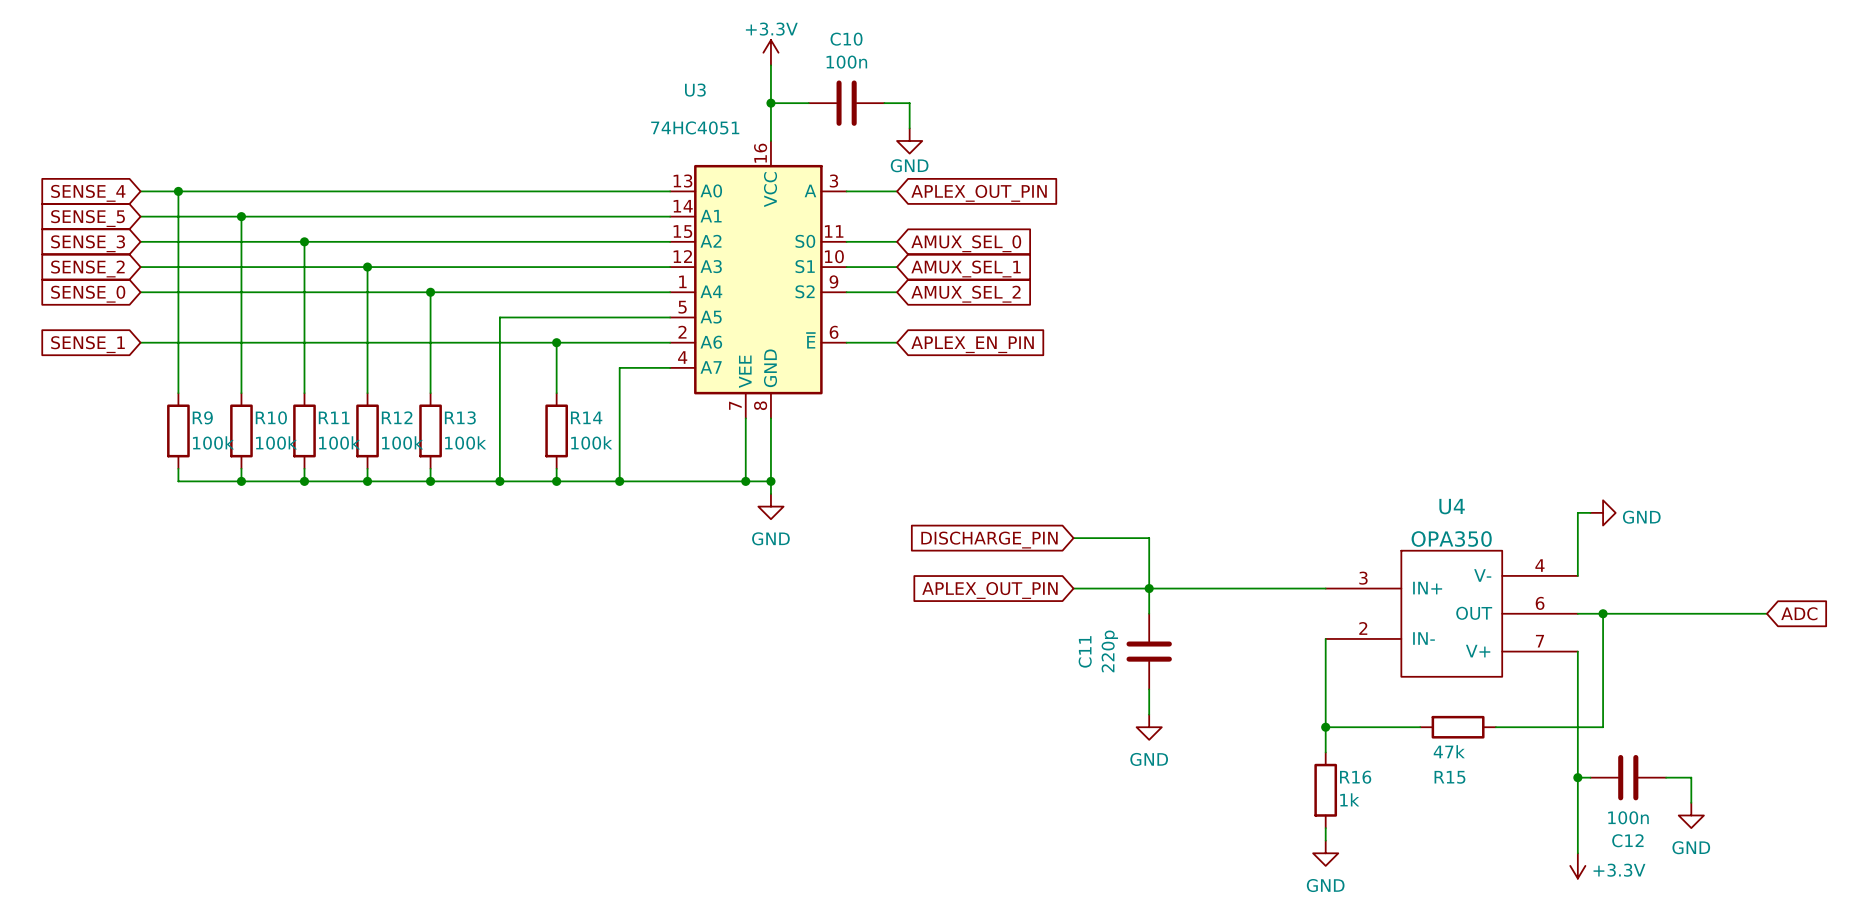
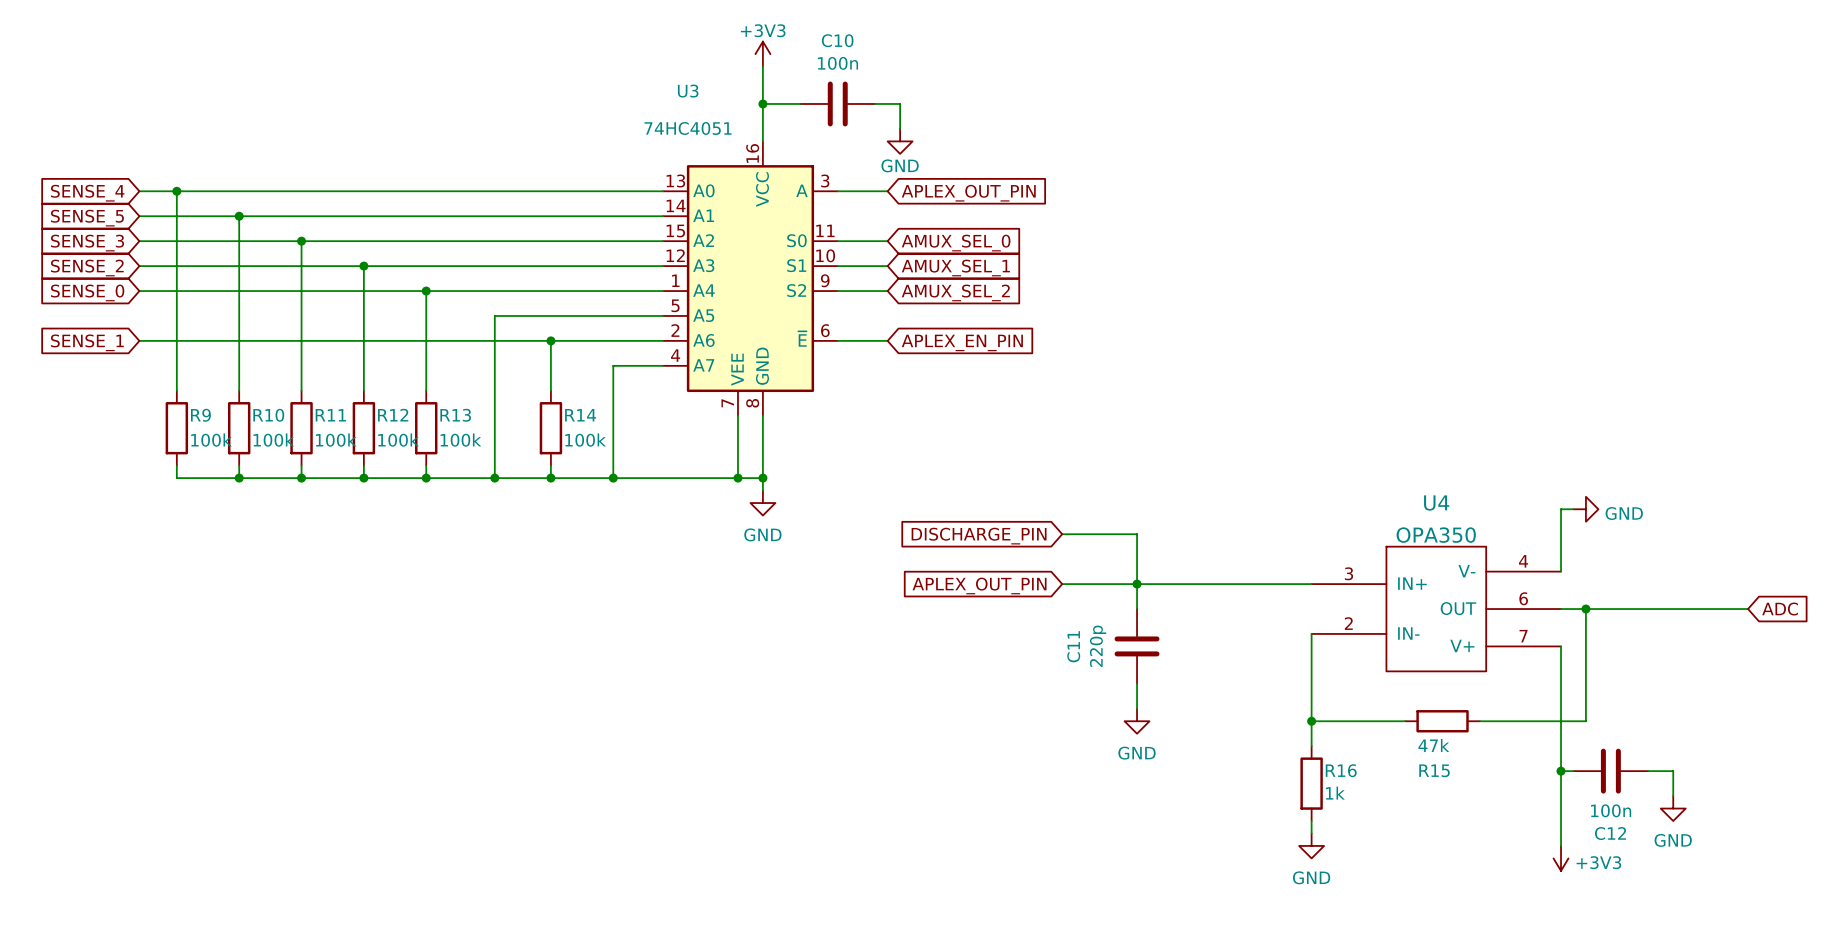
power symbol: +3.3V (770, 52) -> +3V3 (762, 54)
power symbol: +3.3V (1577, 865) -> +3V3 (1561, 858)

